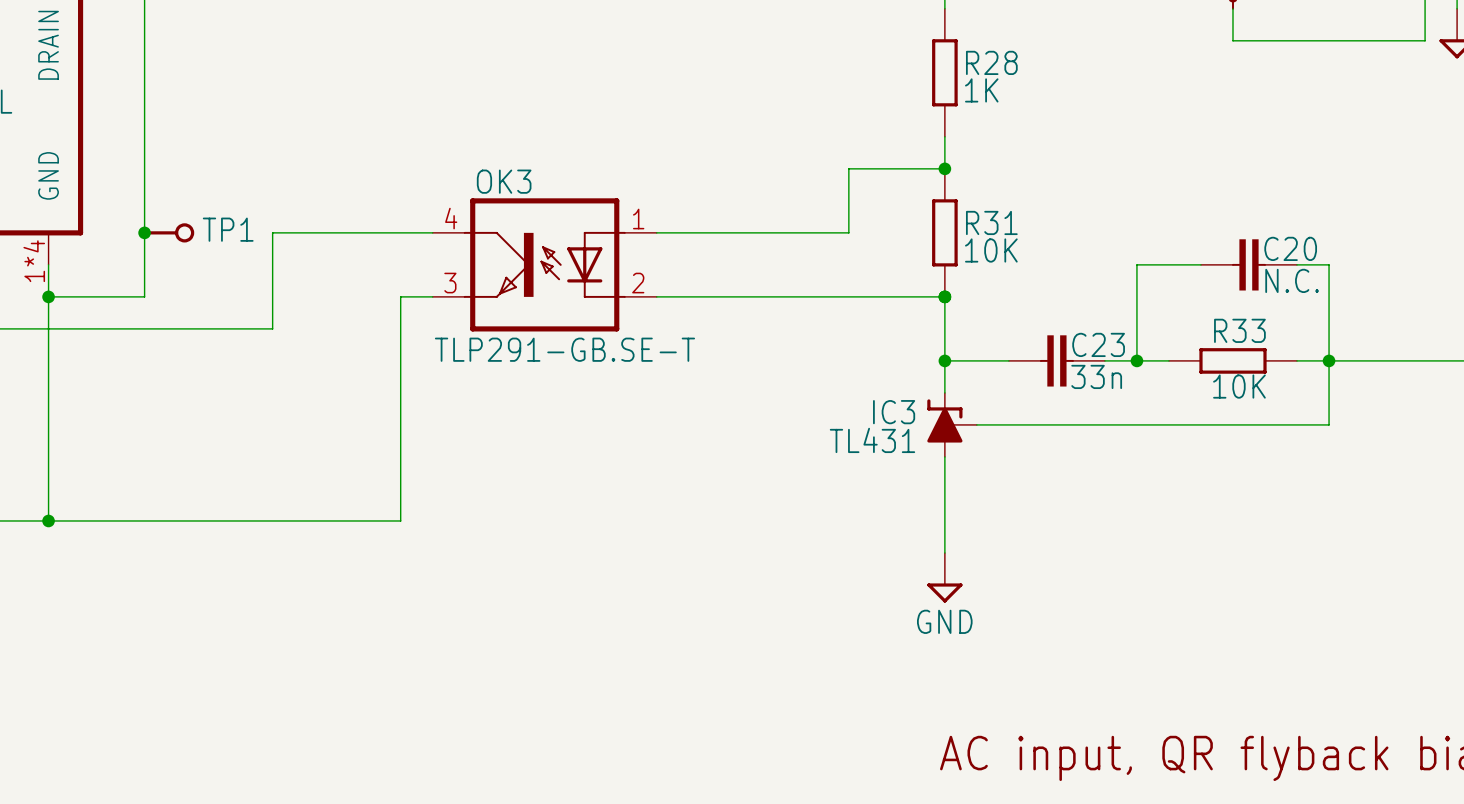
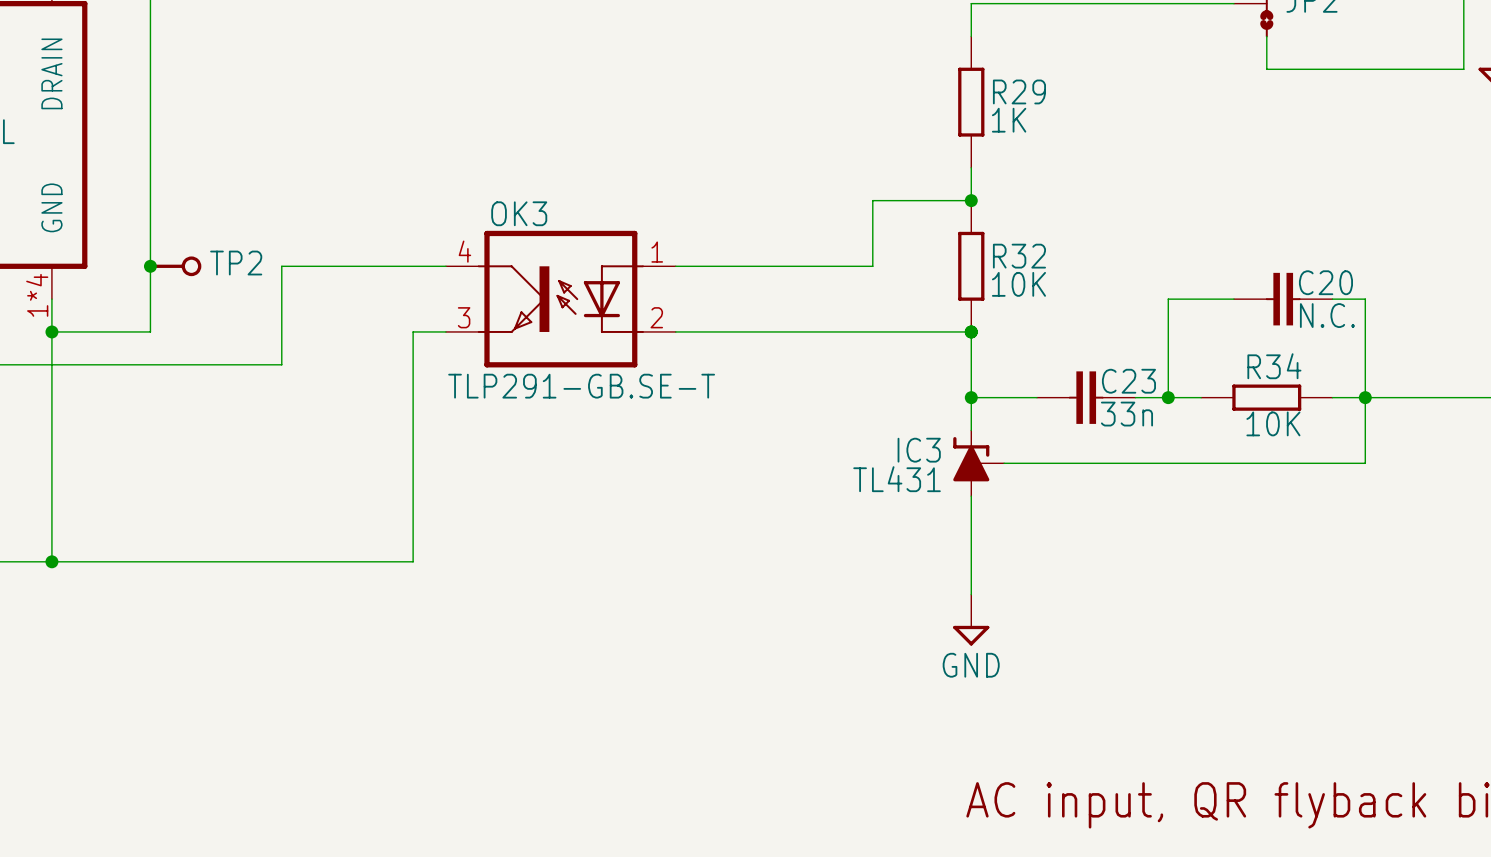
R28 name: R28 (991, 62) -> R29 (1019, 91)
R31 name: R31 (991, 222) -> R32 (1019, 256)
TP1 name: TP1 (228, 229) -> TP2 (236, 263)
R33 name: R33 (1239, 330) -> R34 (1274, 366)

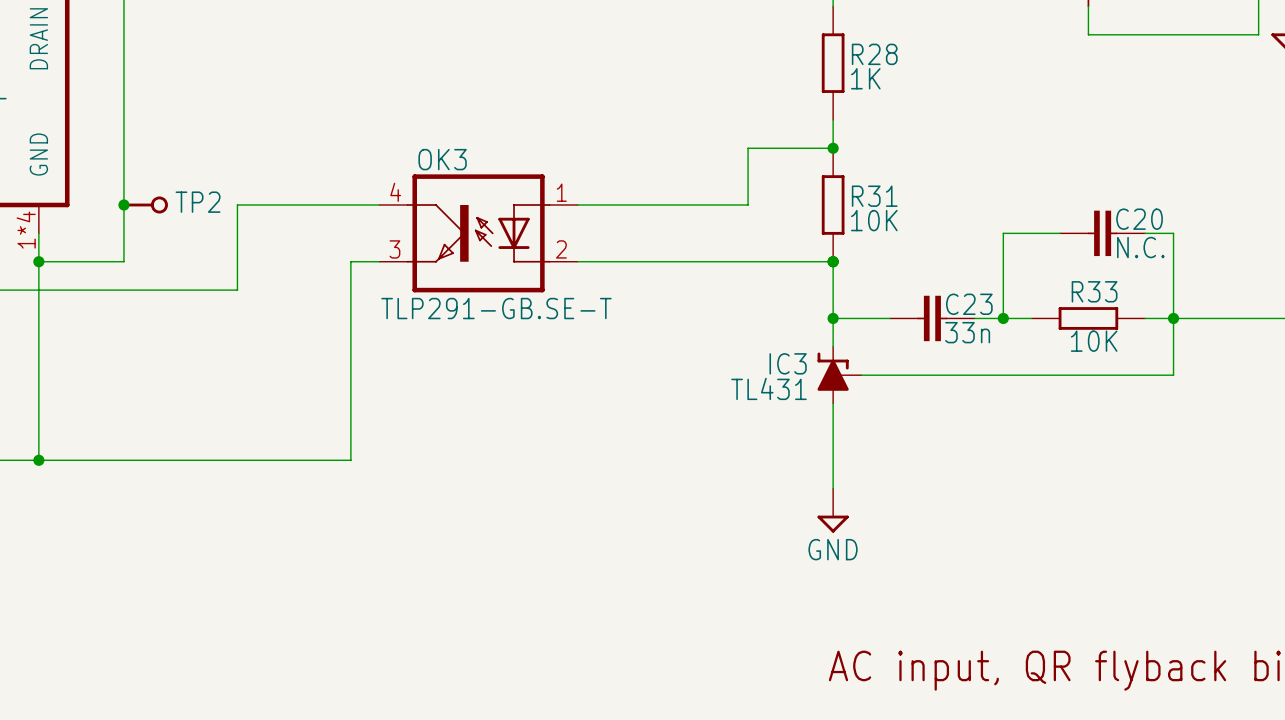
R29 name: R29 (1019, 91) -> R28 (874, 54)
R32 name: R32 (1019, 256) -> R31 (874, 196)
R34 name: R34 (1274, 366) -> R33 (1094, 291)

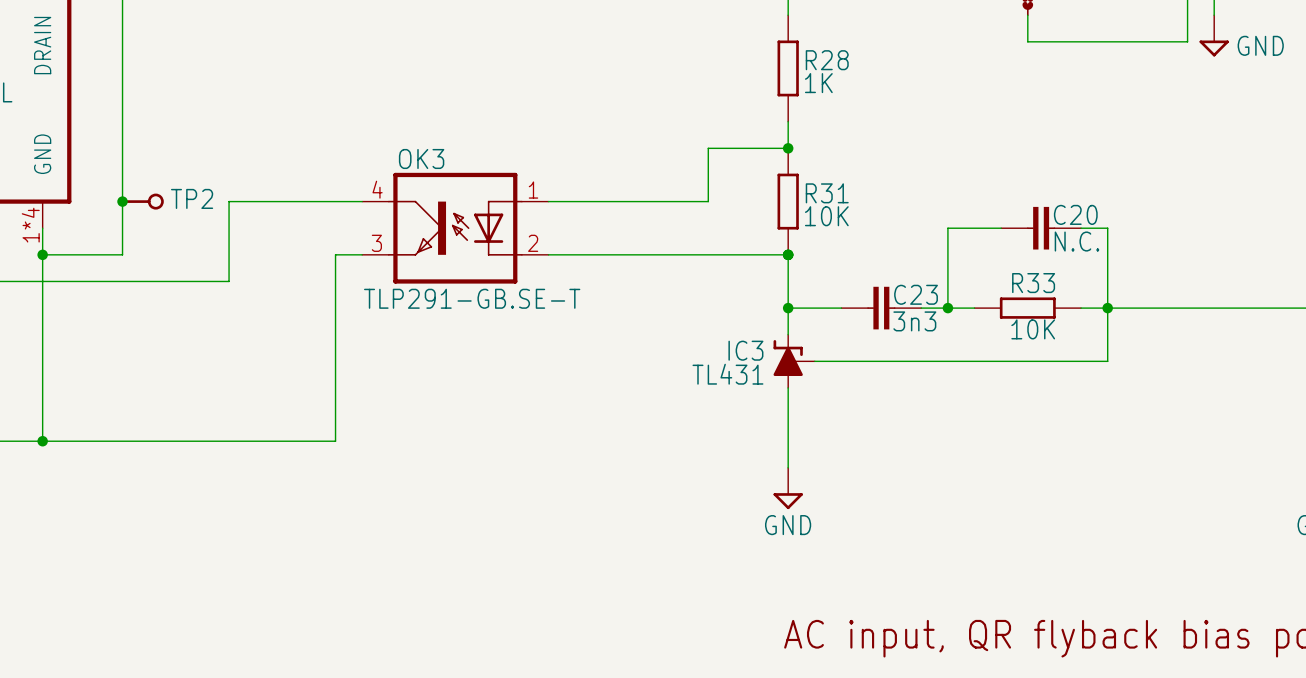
C23 value: 33n (967, 332) -> 3n3 (914, 321)

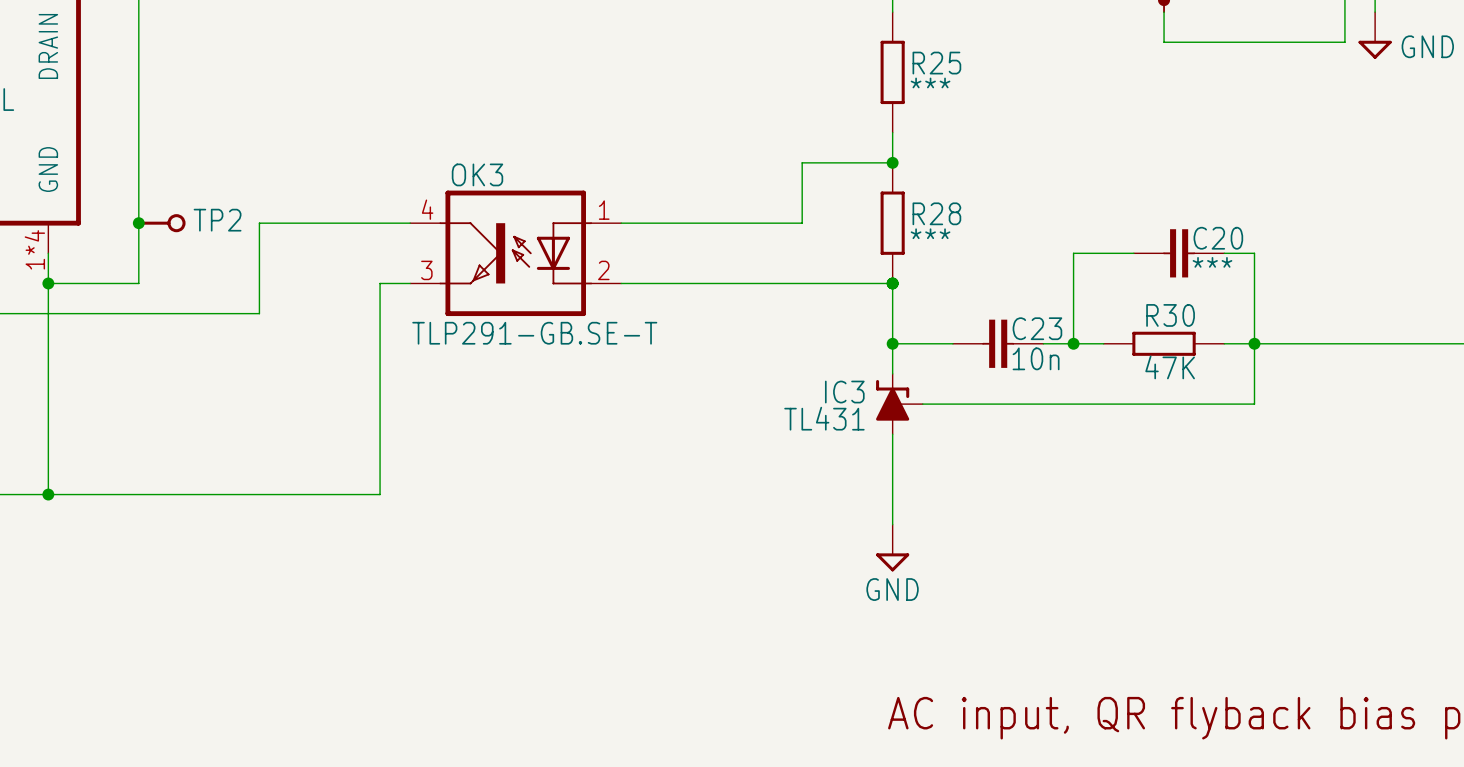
R28 name: R28 (827, 60) -> R25 (936, 63)
R28 value: 1K (818, 83) -> *** (930, 82)
R31 name: R31 (827, 193) -> R28 (936, 213)
R31 value: 10K (826, 216) -> *** (930, 233)
C20 value: N.C. (1076, 241) -> *** (1212, 262)
R33 name: R33 (1033, 283) -> R30 (1170, 315)
C23 value: 3n3 (914, 321) -> 10n (1036, 358)
R33 value: 10K (1033, 329) -> 47K (1170, 367)

